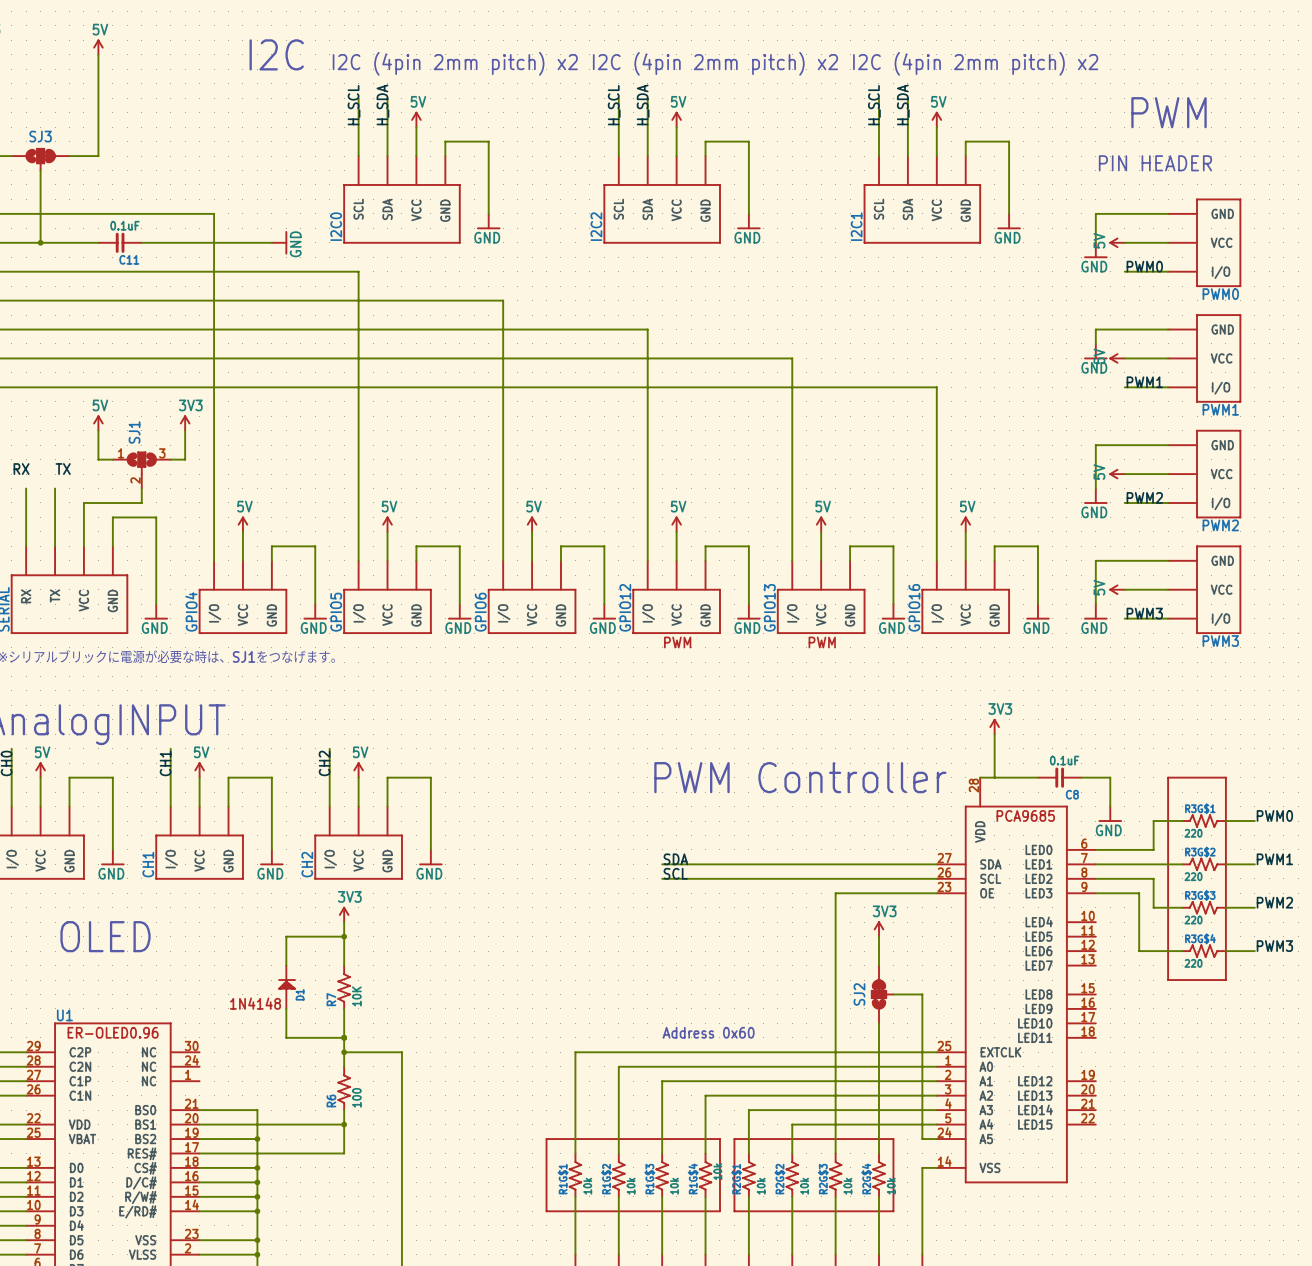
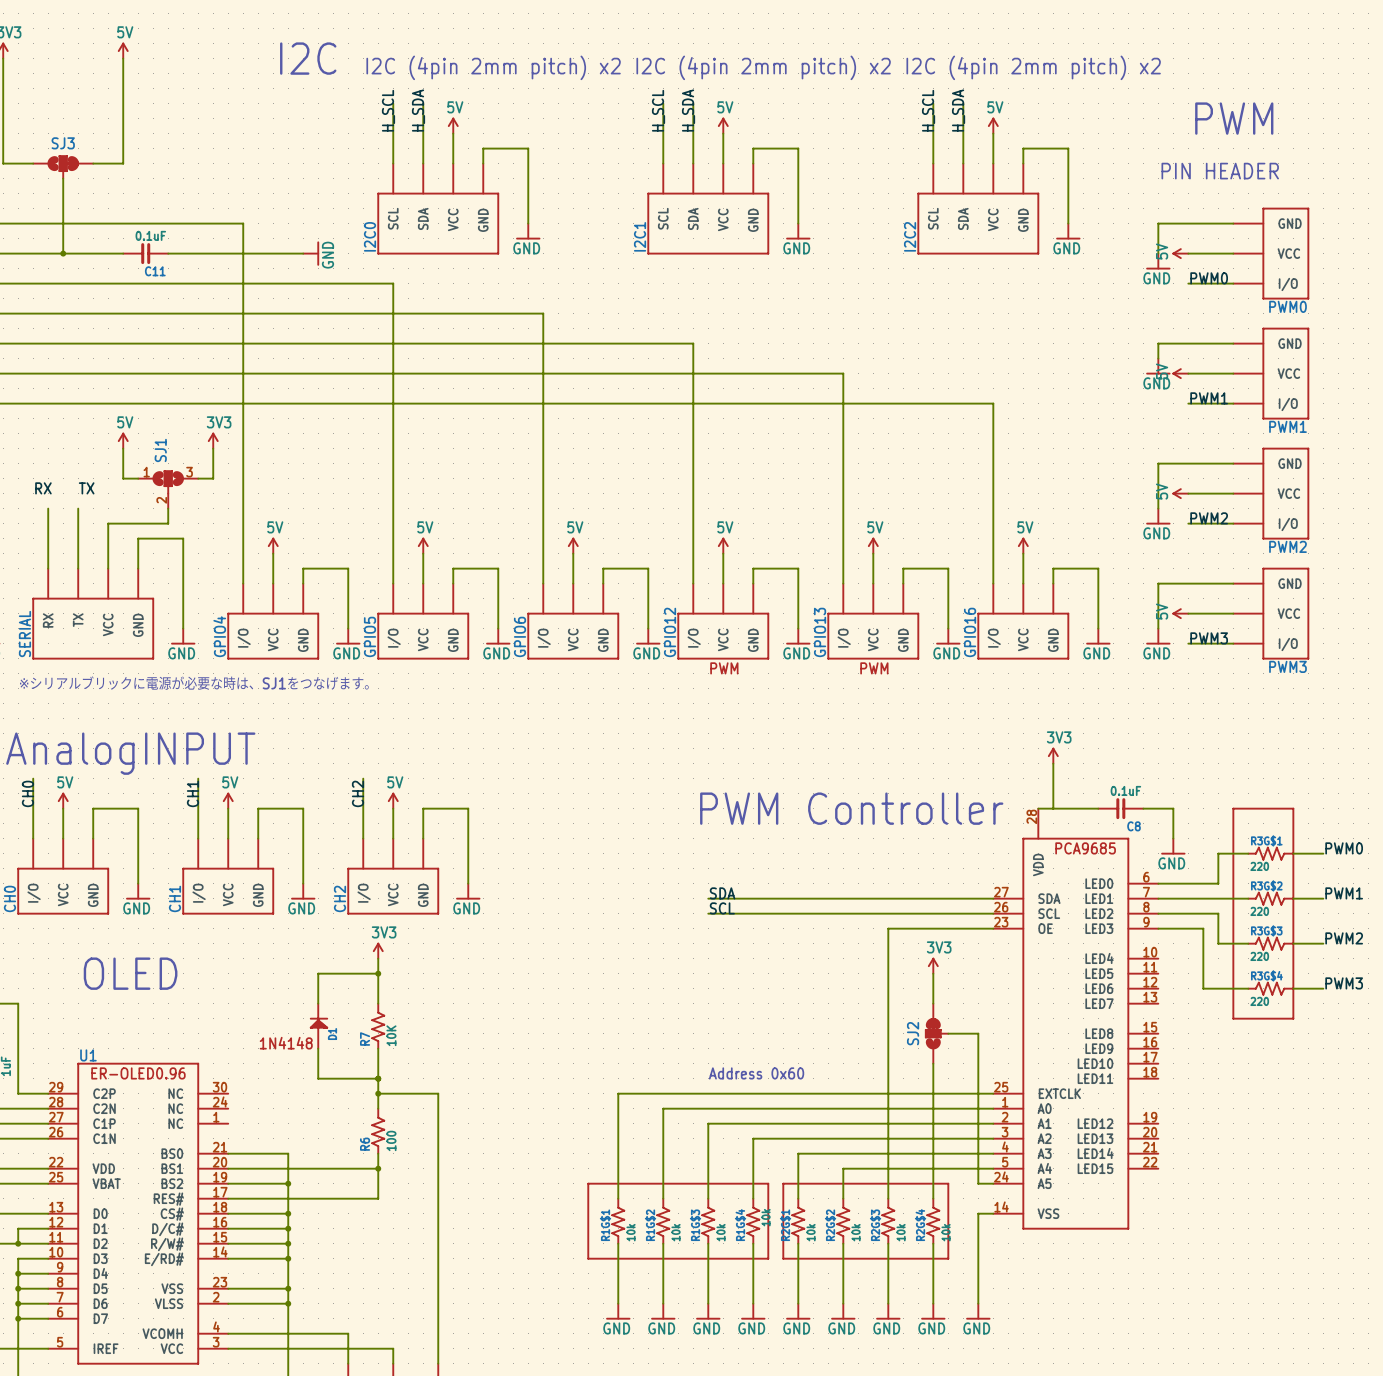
I2C2 name: I2C2 (596, 226) -> I2C1 (640, 236)
I2C1 name: I2C1 (856, 226) -> I2C2 (910, 236)

